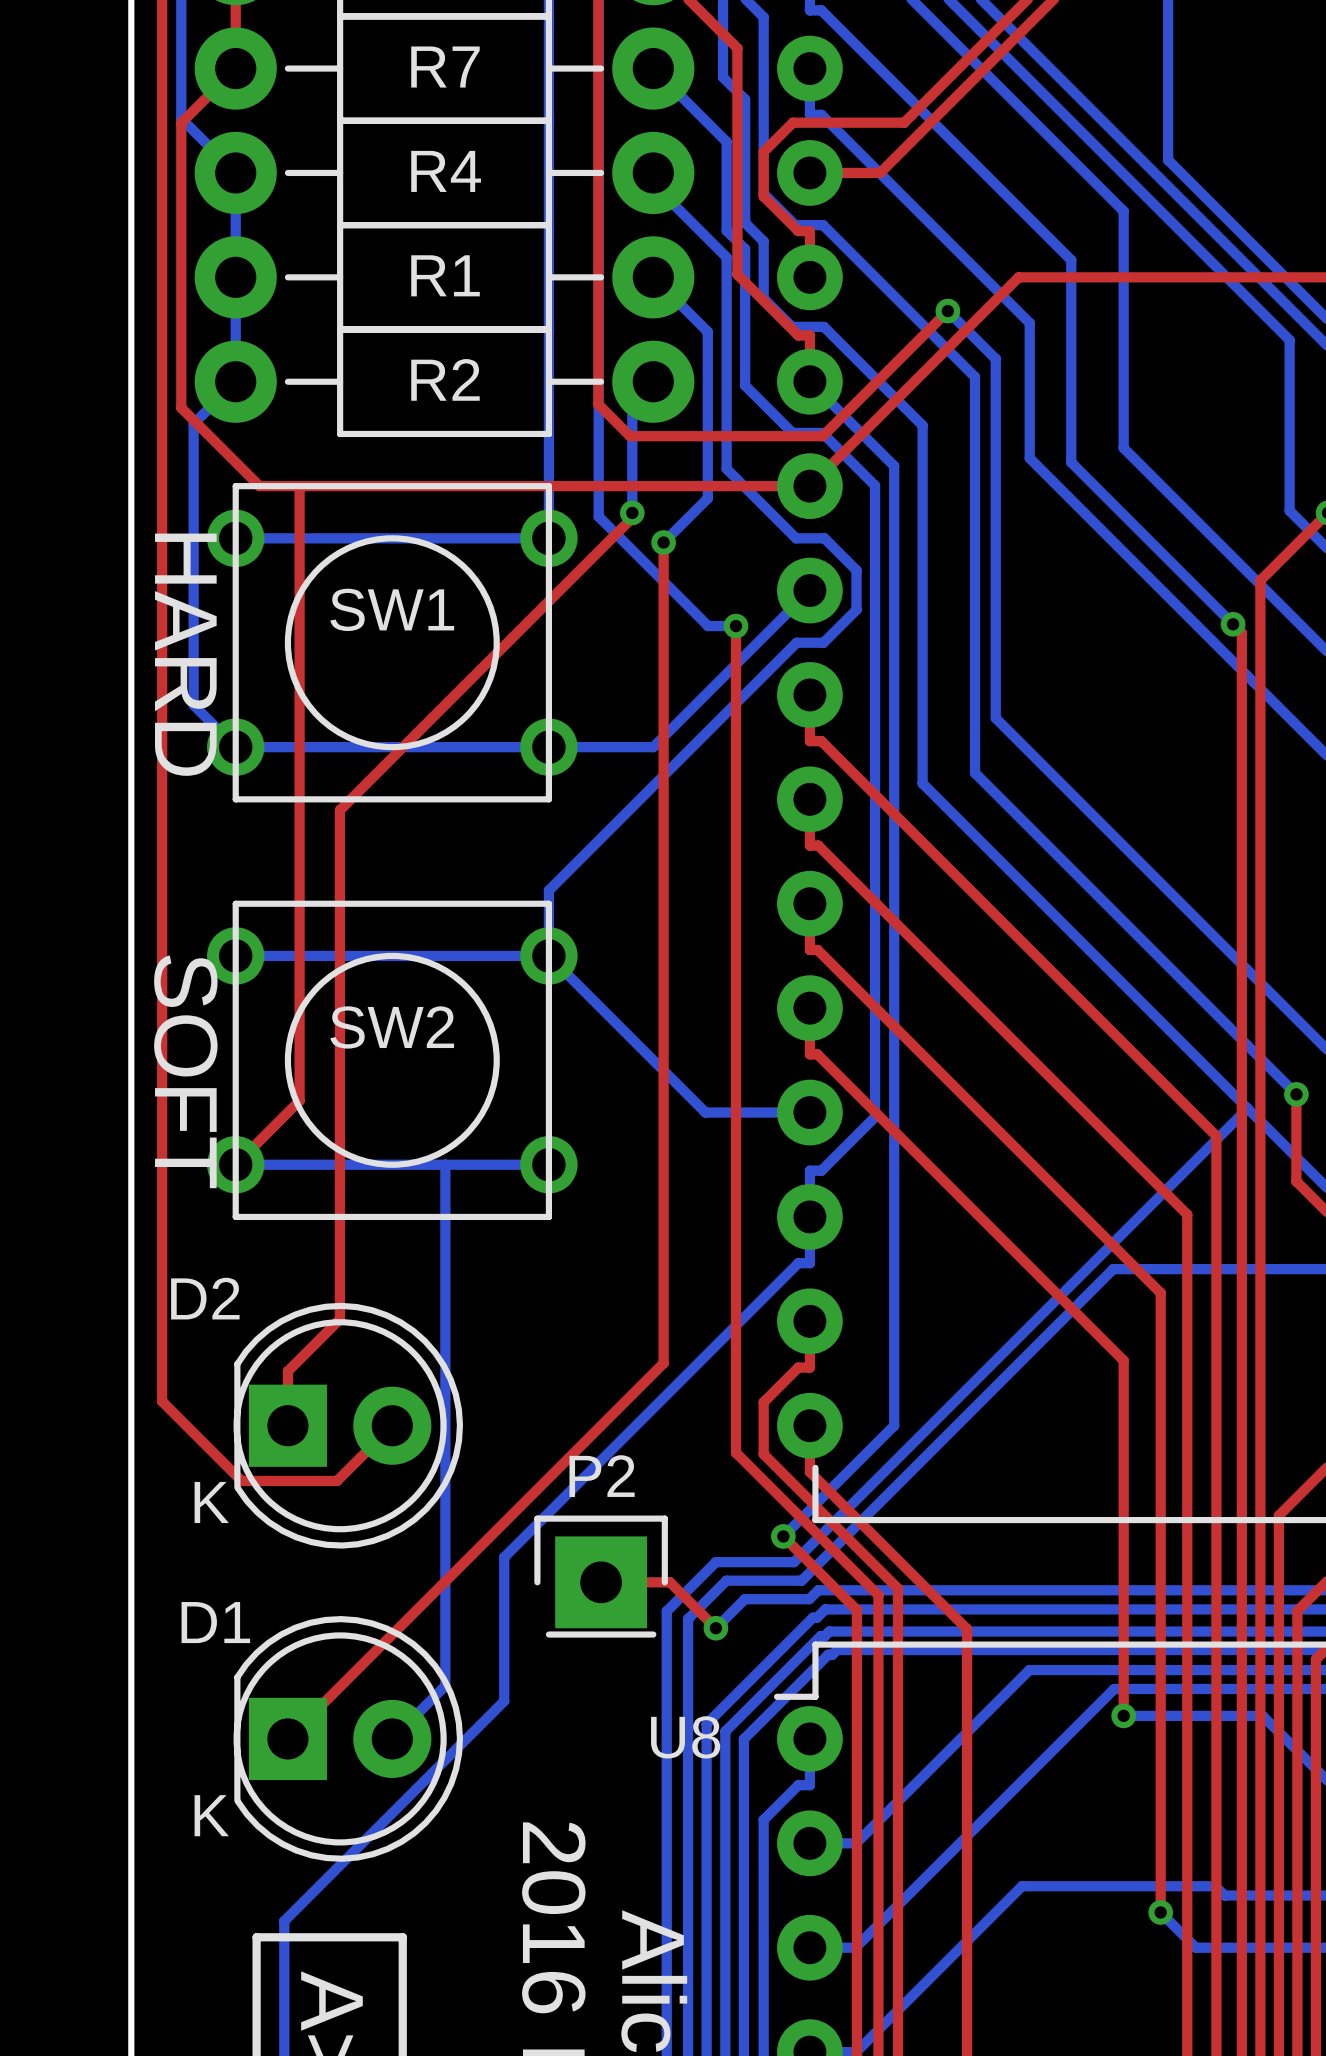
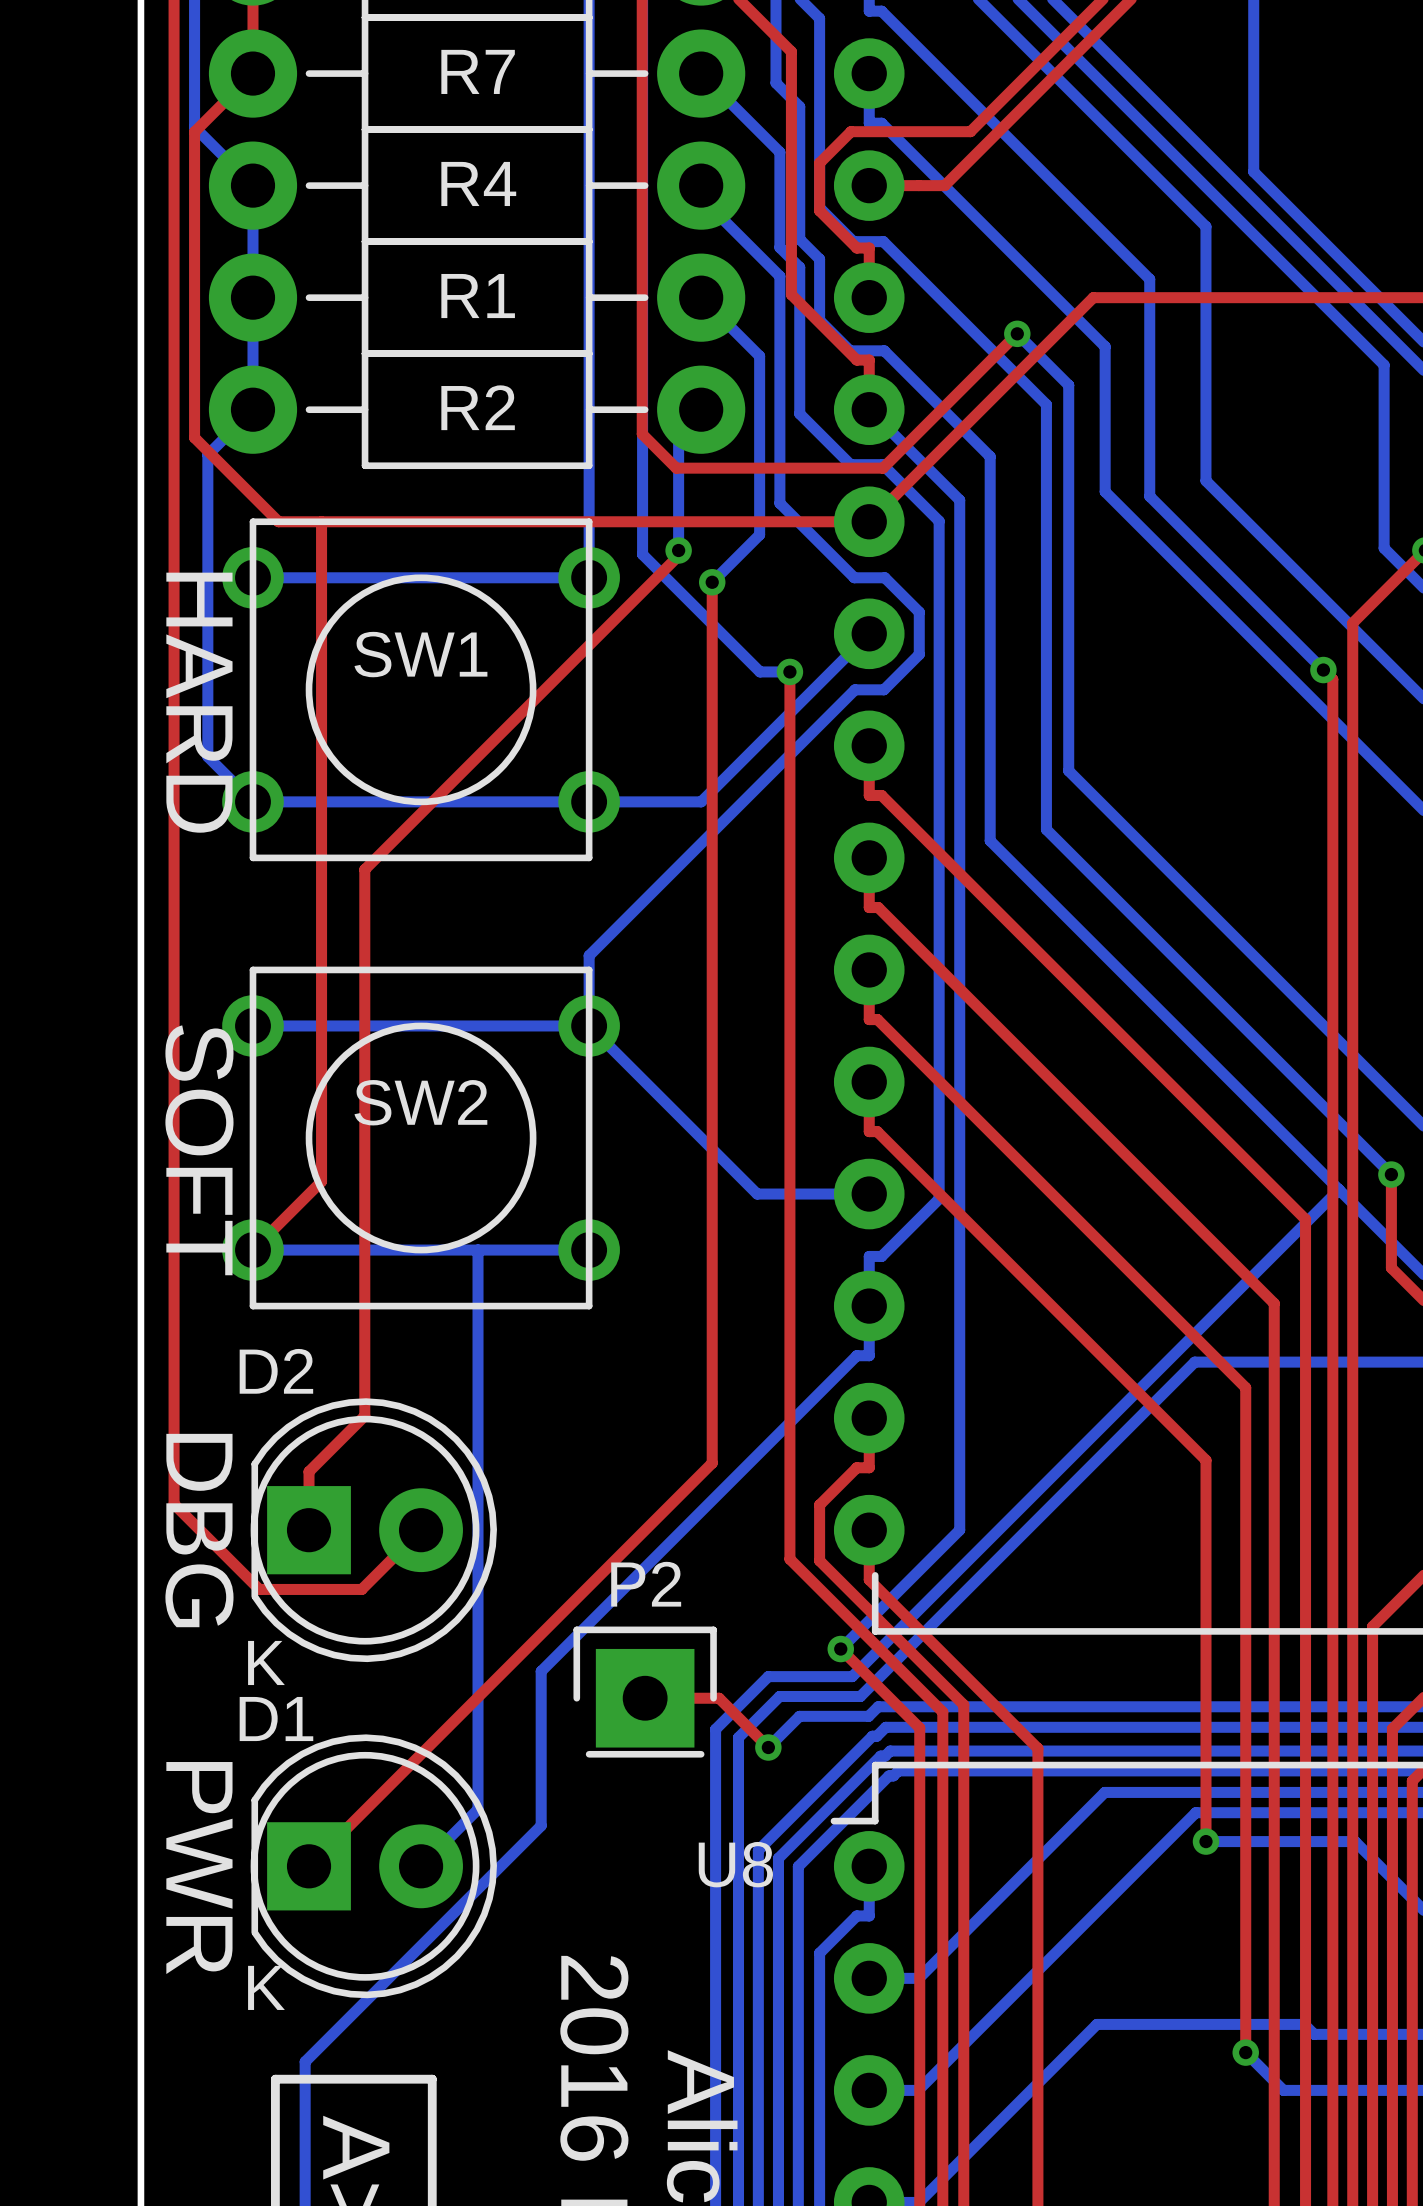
D2 name position: D2 (205, 1298) -> D2 (276, 1371)
text: none -> DBG (199, 1530)
D2 text position: K (211, 1502) -> K (266, 1662)
D1 name position: D1 (215, 1622) -> D1 (276, 1719)
text: none -> PWR (199, 1868)
D1 text position: K (211, 1815) -> K (266, 1987)

